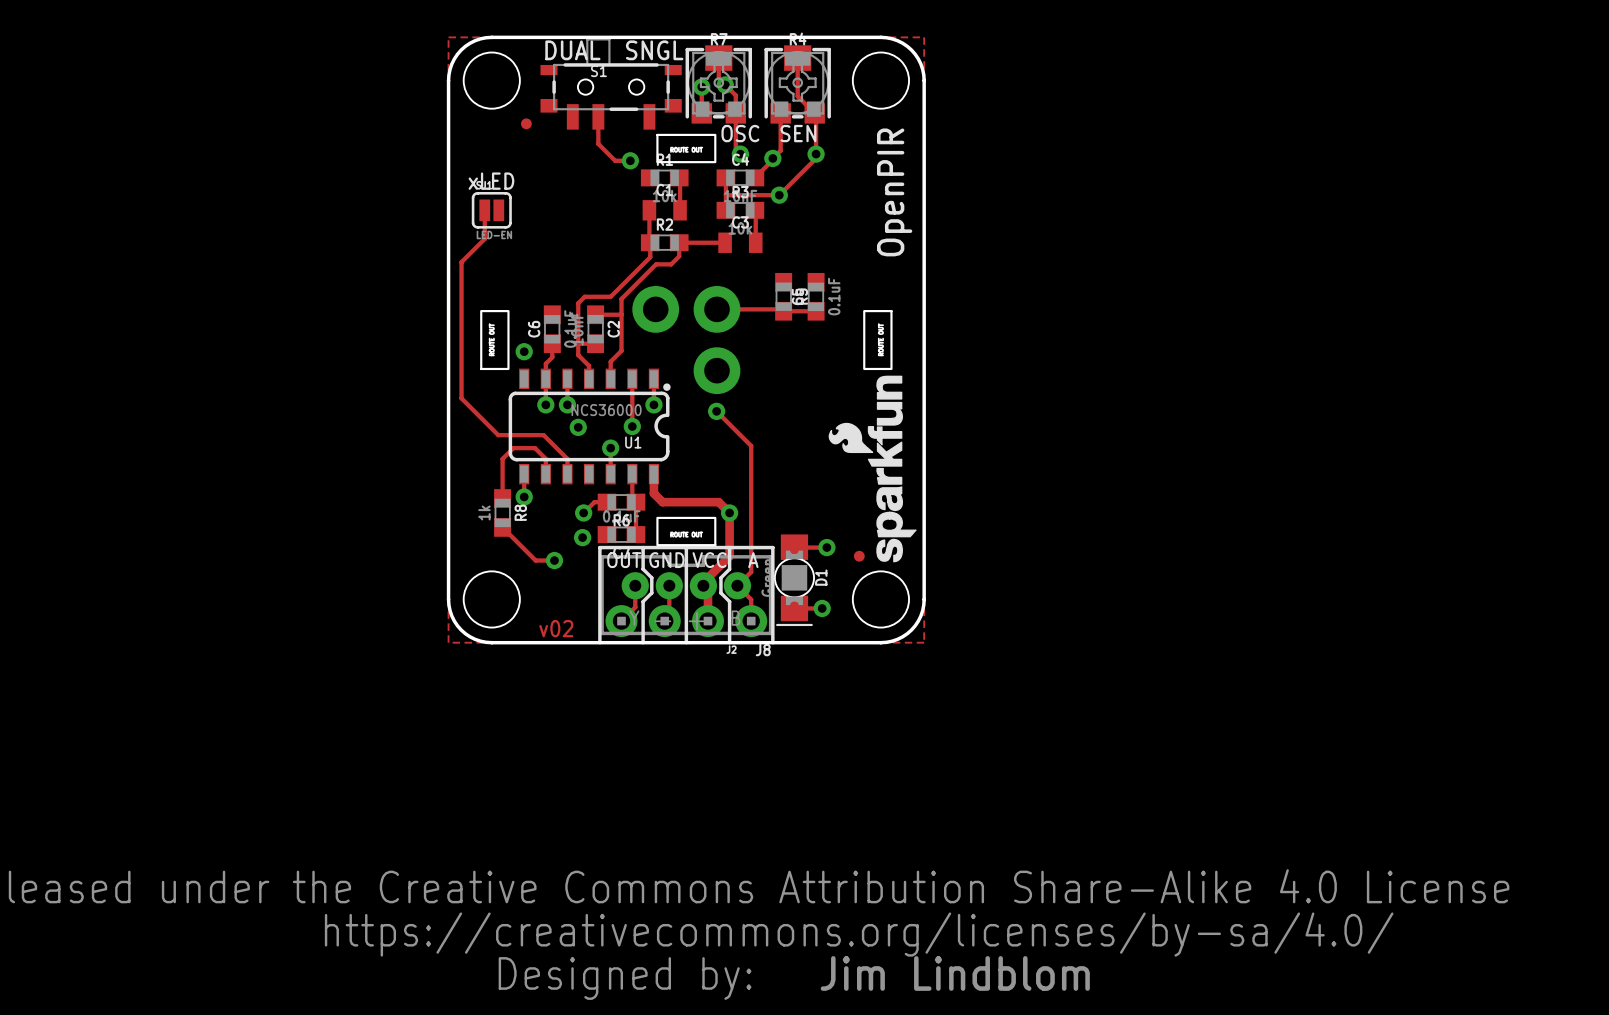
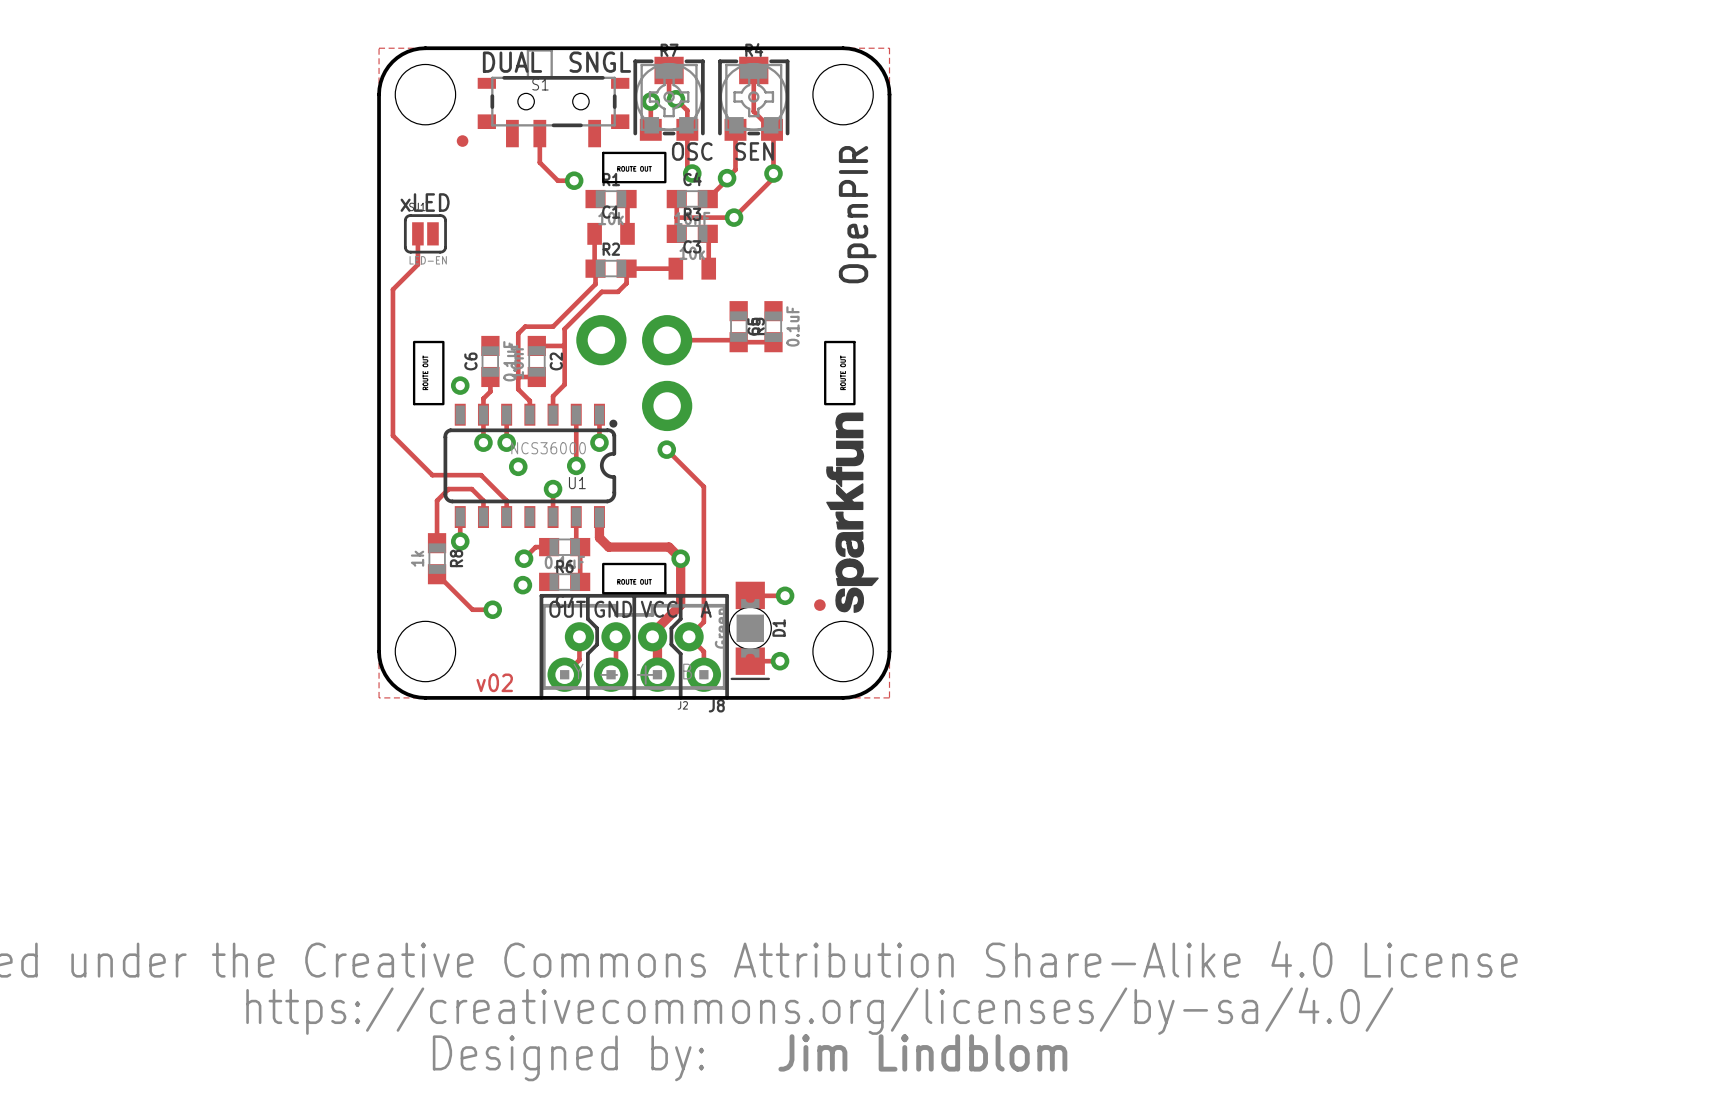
drawing: [828, 375, 917, 563] -> none
drawing: none -> [826, 412, 879, 613]

